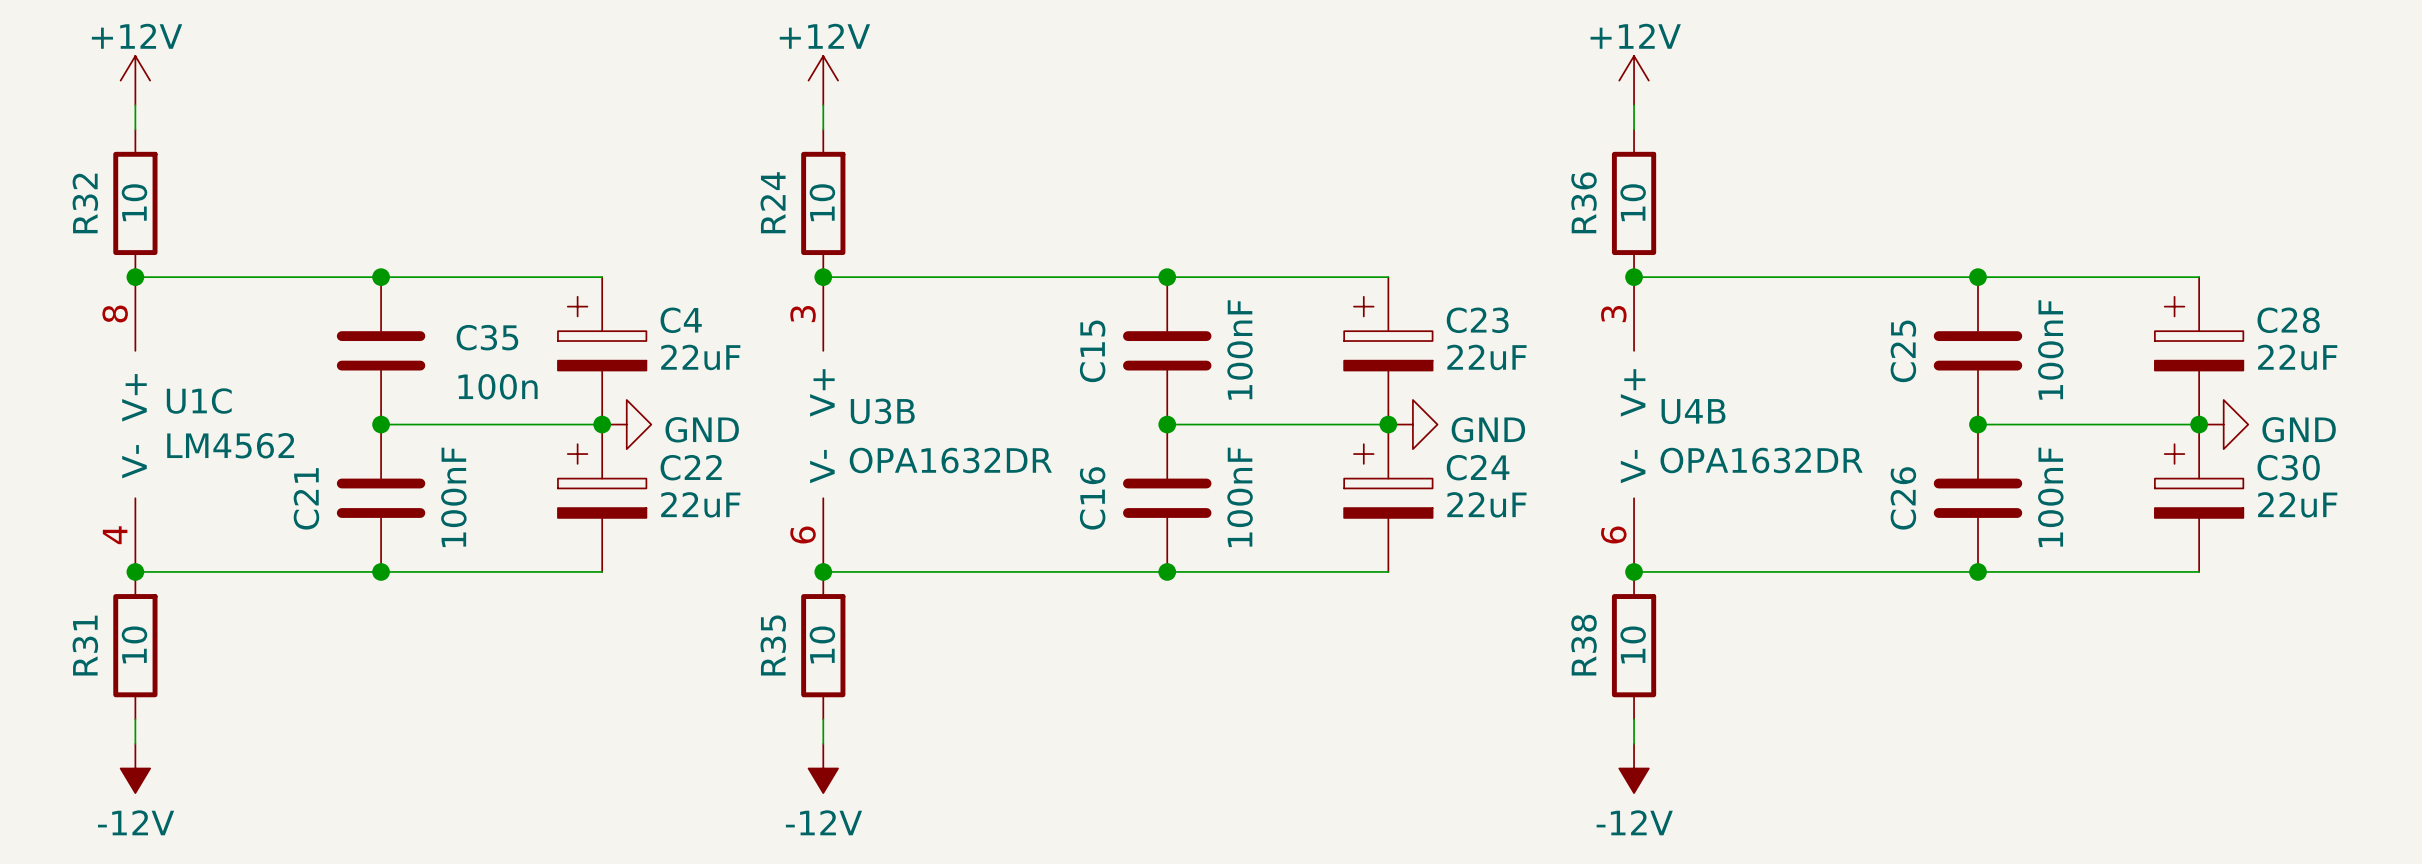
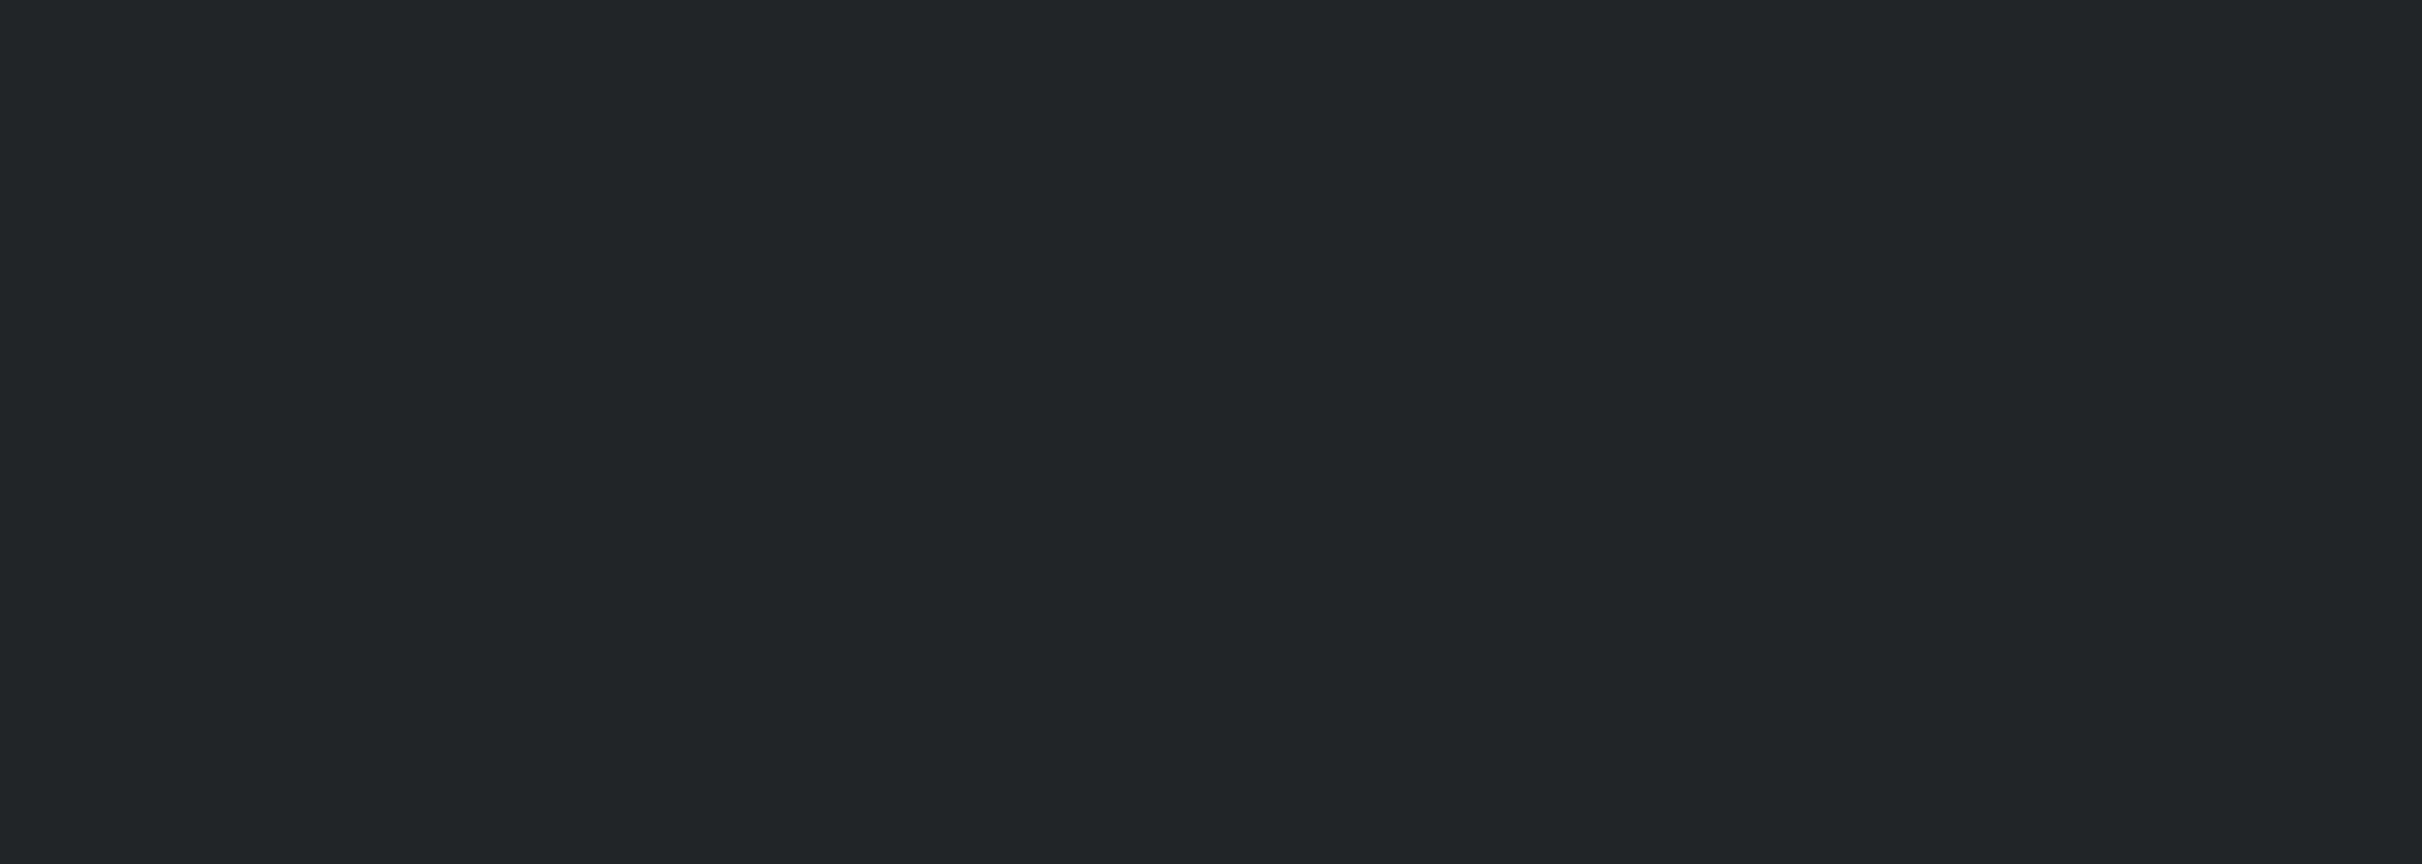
power symbol: +12V (135, 80) -> none
power symbol: +12V (823, 80) -> none
power symbol: +12V (1634, 80) -> none
wire: (135, 105) (135, 129) -> none
wire: (823, 105) (823, 129) -> none
wire: (1634, 105) (1634, 129) -> none
R32: 10 (135, 203) -> none
R24: 10 (823, 203) -> none
R36: 10 (1634, 203) -> none
wire: (135, 277) (602, 277) -> none
junction: (135, 277) -> none
junction: (381, 277) -> none
wire: (823, 277) (1388, 277) -> none
junction: (823, 277) -> none
junction: (1167, 277) -> none
wire: (1634, 277) (2199, 277) -> none
junction: (1634, 277) -> none
junction: (1978, 277) -> none
C35: 100n (381, 350) -> none
C4: 22uF (602, 350) -> none
C15: 100nF (1167, 350) -> none
C23: 22uF (1388, 350) -> none
C25: 100nF (1978, 350) -> none
C28: 22uF (2199, 350) -> none
U1C: LM4562 (135, 424) -> none
wire: (381, 424) (602, 424) -> none
junction: (381, 424) -> none
junction: (602, 424) -> none
power symbol: GND (626, 424) -> none
U3B: OPA1632DR (823, 424) -> none
wire: (1167, 424) (1388, 424) -> none
junction: (1167, 424) -> none
junction: (1388, 424) -> none
power symbol: GND (1412, 424) -> none
U4B: OPA1632DR (1634, 424) -> none
wire: (1978, 424) (2199, 424) -> none
junction: (1978, 424) -> none
junction: (2199, 424) -> none
power symbol: GND (2223, 424) -> none
C21: 100nF (381, 498) -> none
C22: 22uF (602, 498) -> none
C16: 100nF (1167, 498) -> none
C24: 22uF (1388, 498) -> none
C26: 100nF (1978, 498) -> none
C30: 22uF (2199, 498) -> none
wire: (135, 571) (602, 571) -> none
junction: (135, 571) -> none
junction: (381, 571) -> none
wire: (823, 571) (1388, 571) -> none
junction: (823, 571) -> none
junction: (1167, 571) -> none
wire: (1634, 571) (2199, 571) -> none
junction: (1634, 571) -> none
junction: (1978, 571) -> none
R31: 10 (135, 645) -> none
R35: 10 (823, 645) -> none
R38: 10 (1634, 645) -> none
wire: (135, 719) (135, 743) -> none
wire: (823, 719) (823, 743) -> none
wire: (1634, 719) (1634, 743) -> none
power symbol: -12V (135, 768) -> none
power symbol: -12V (823, 768) -> none
power symbol: -12V (1634, 768) -> none

